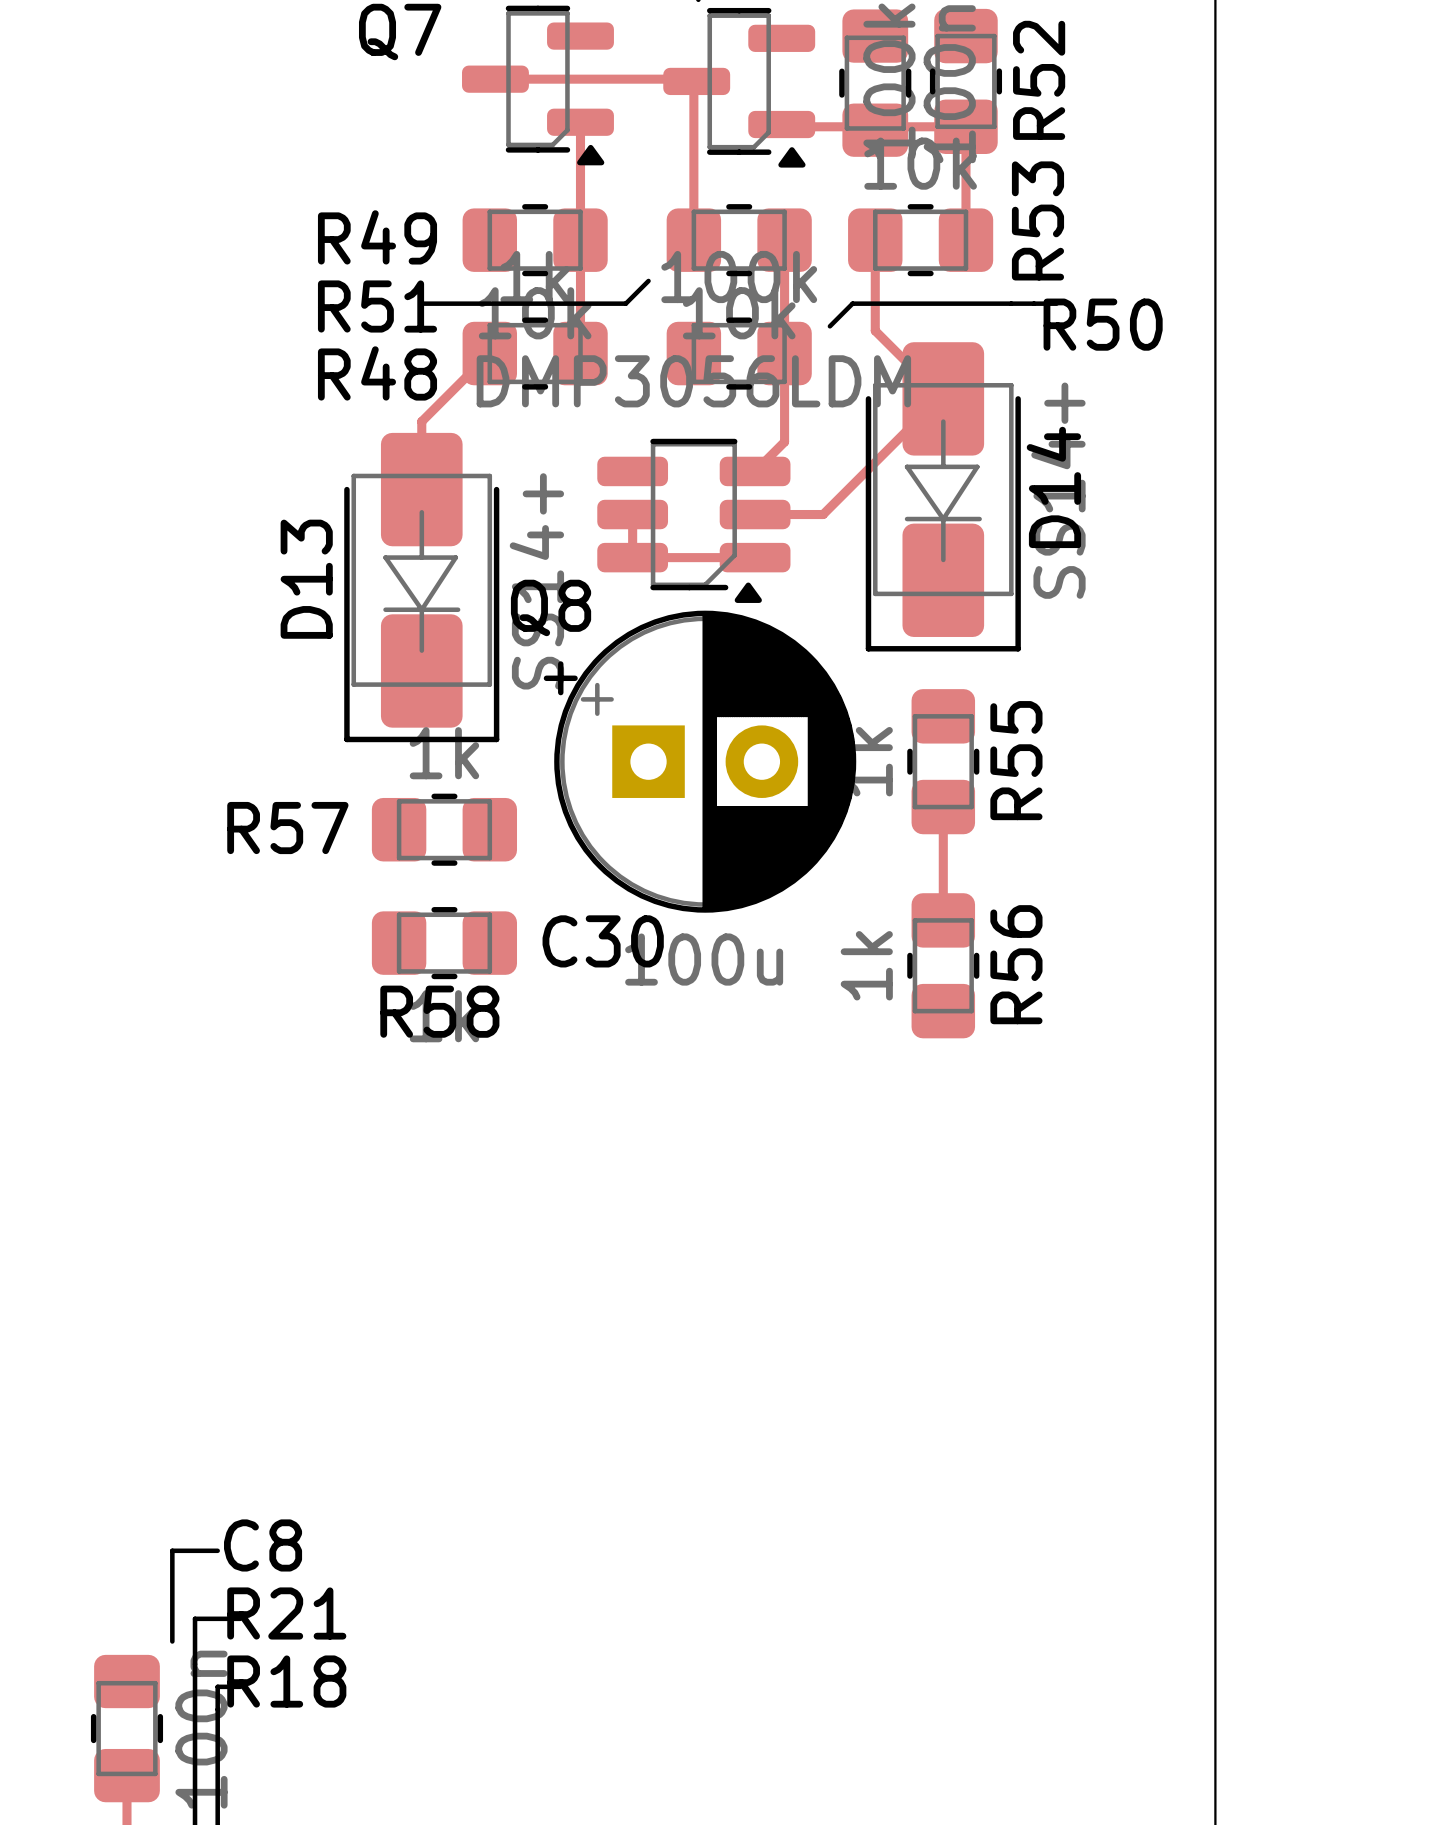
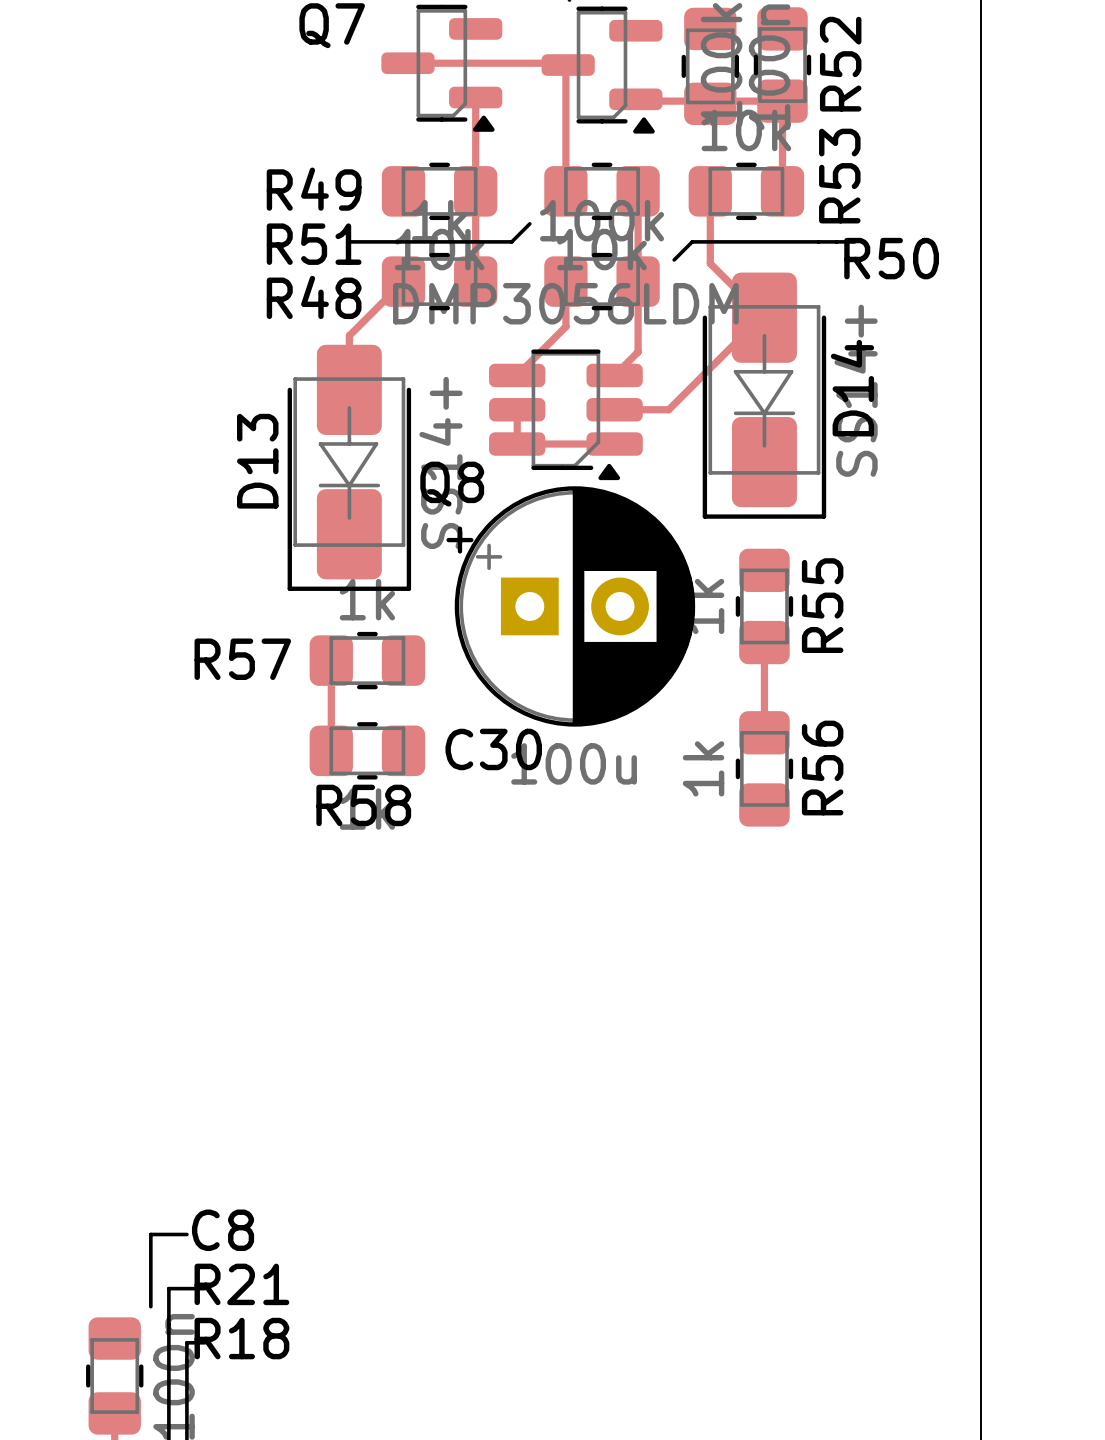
top track: none -> (565, 281) (565, 326) (517, 375)
top track: none -> (331, 660) (331, 750)

